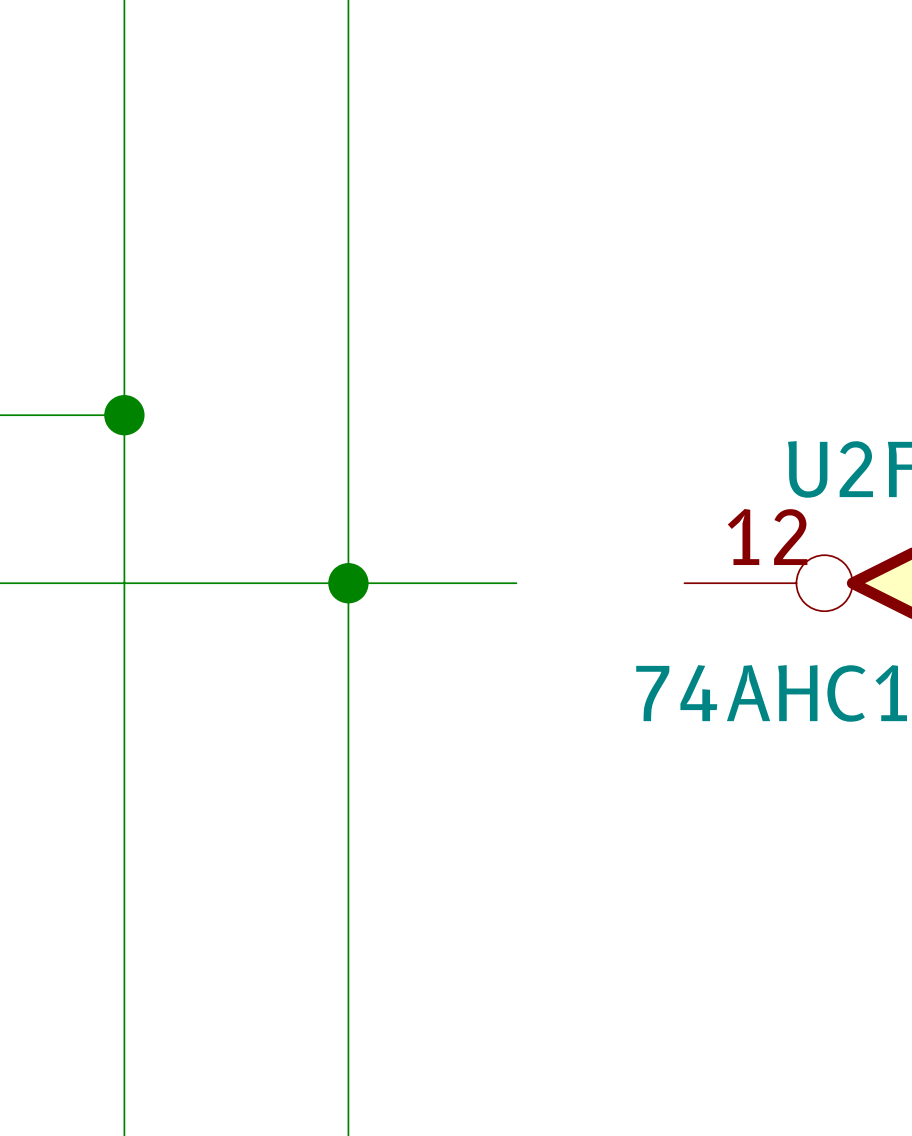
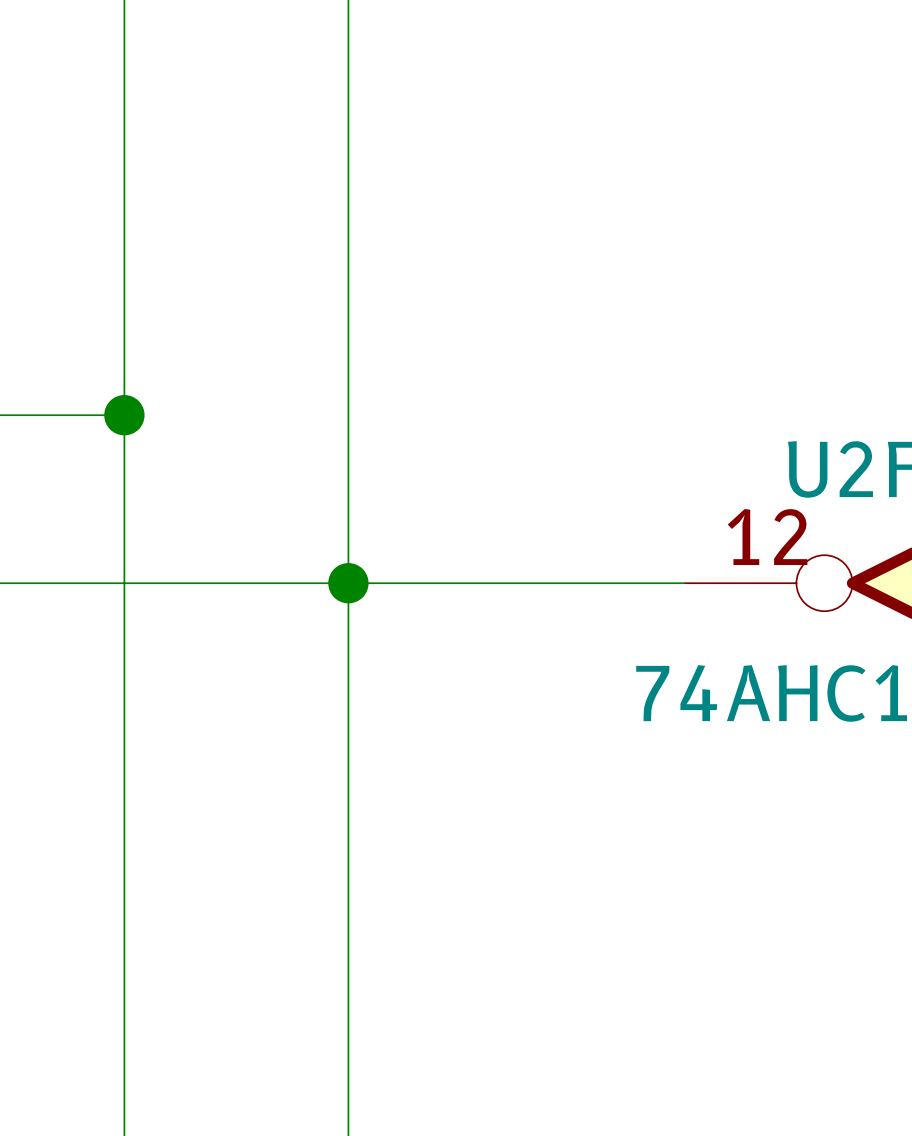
wire: none -> (516, 583) (684, 583)

